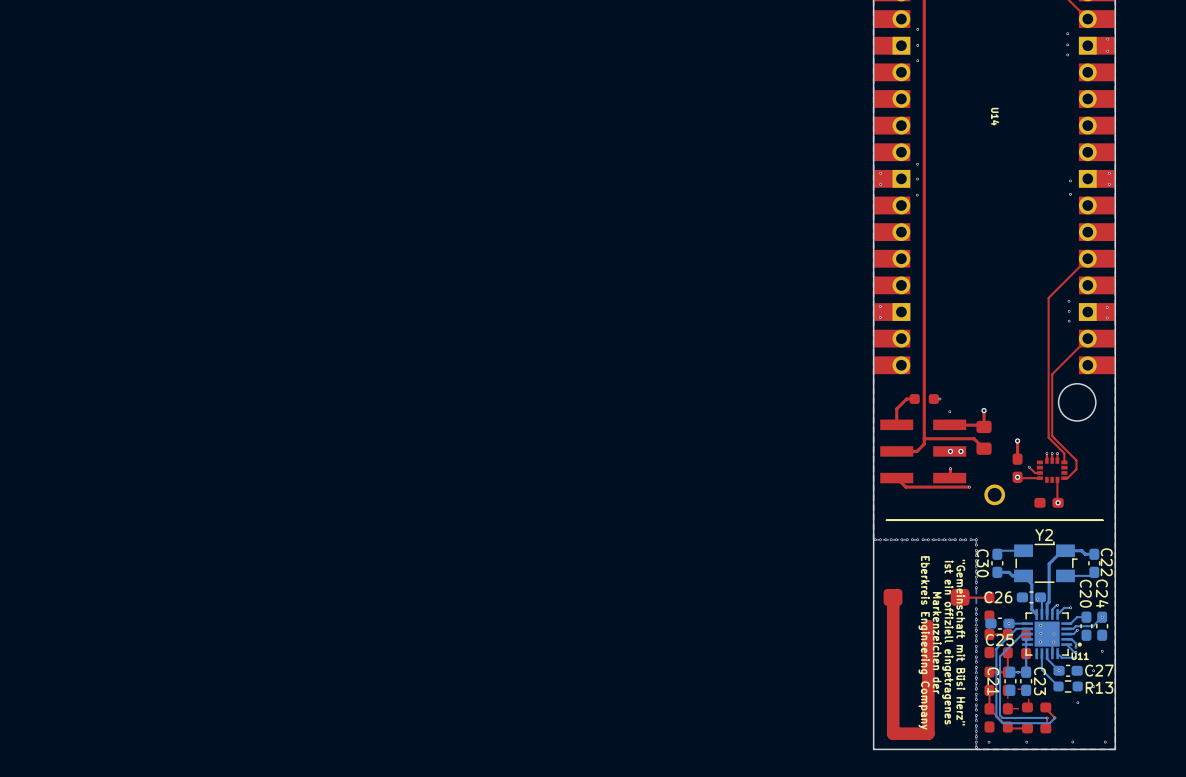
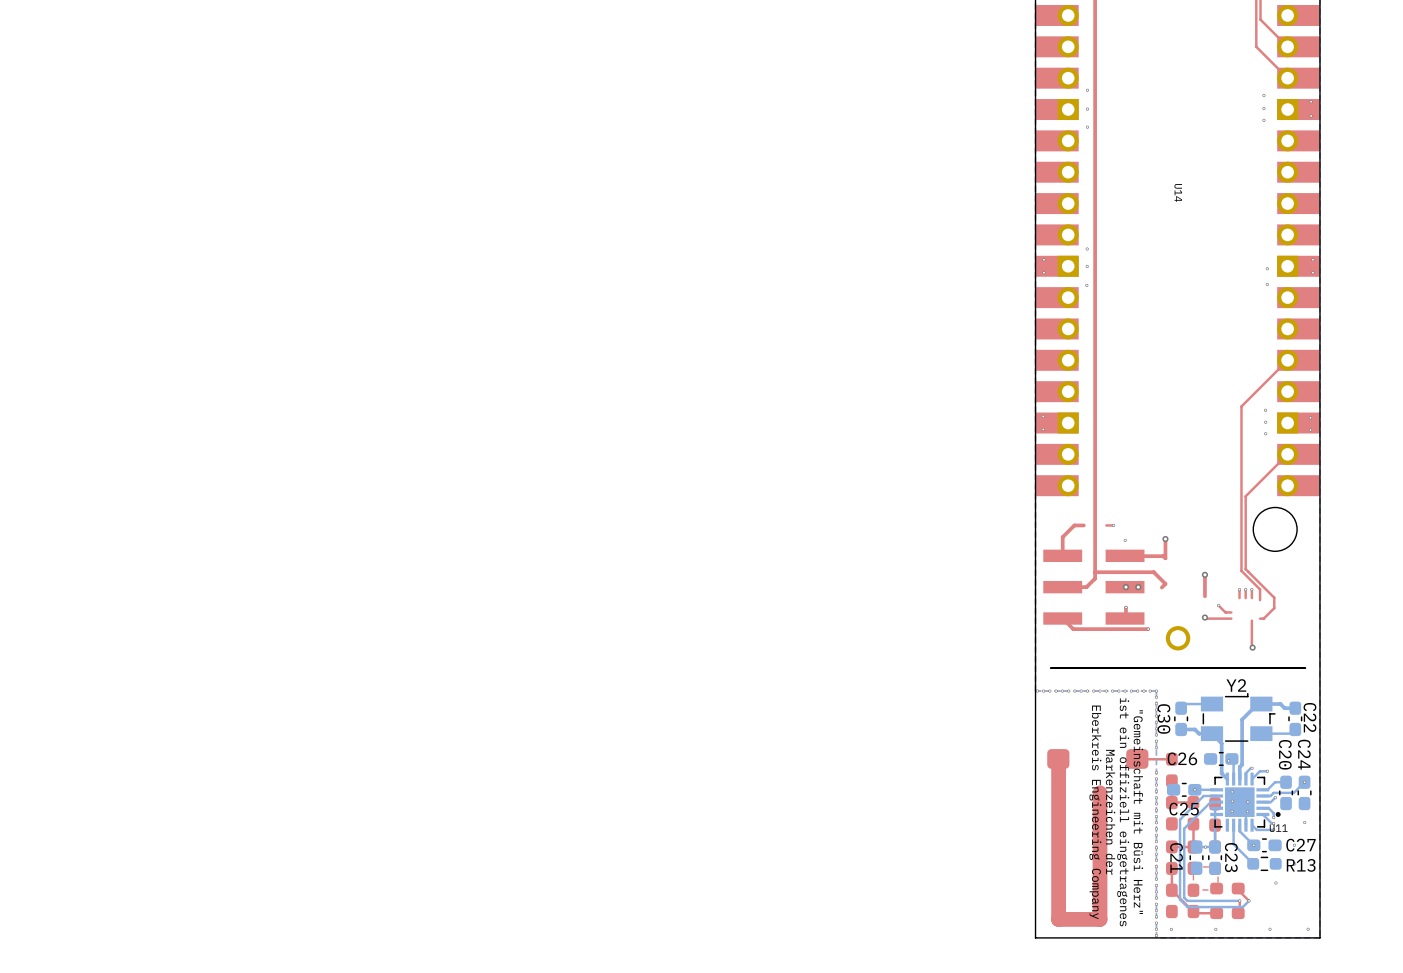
part: (924, 399) -> none
part: (984, 437) -> none
part: (1017, 468) -> none
part: (1052, 470) -> none
part: (1049, 502) -> none

